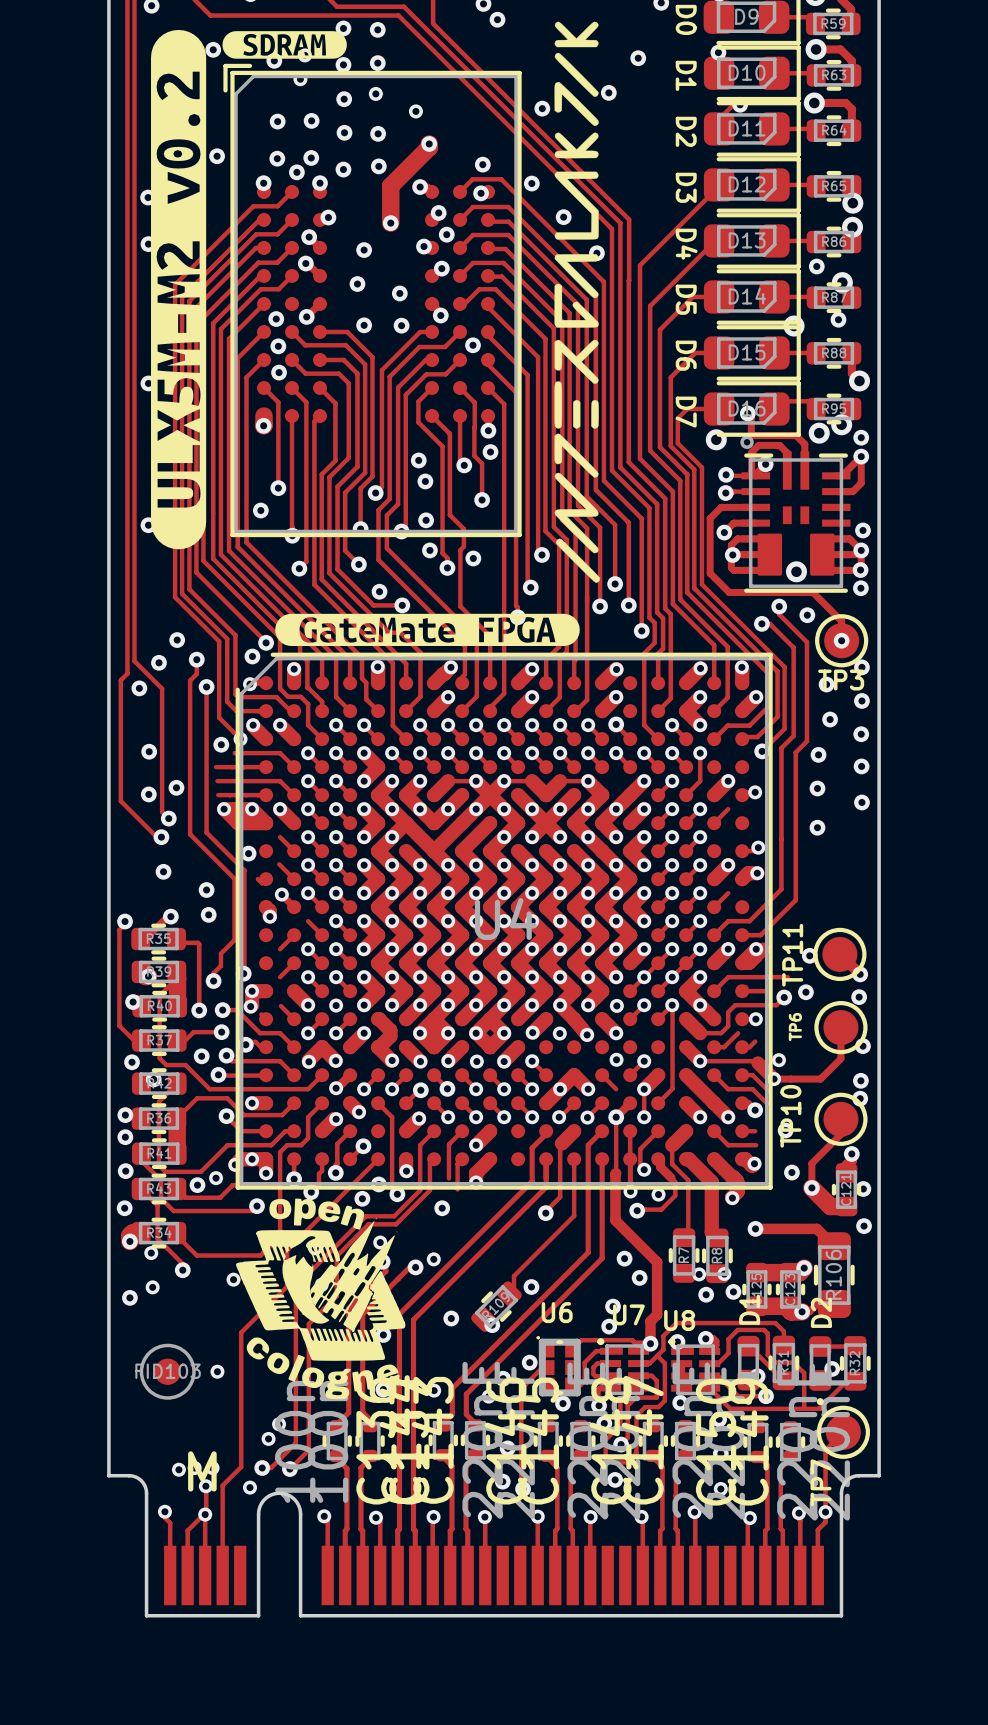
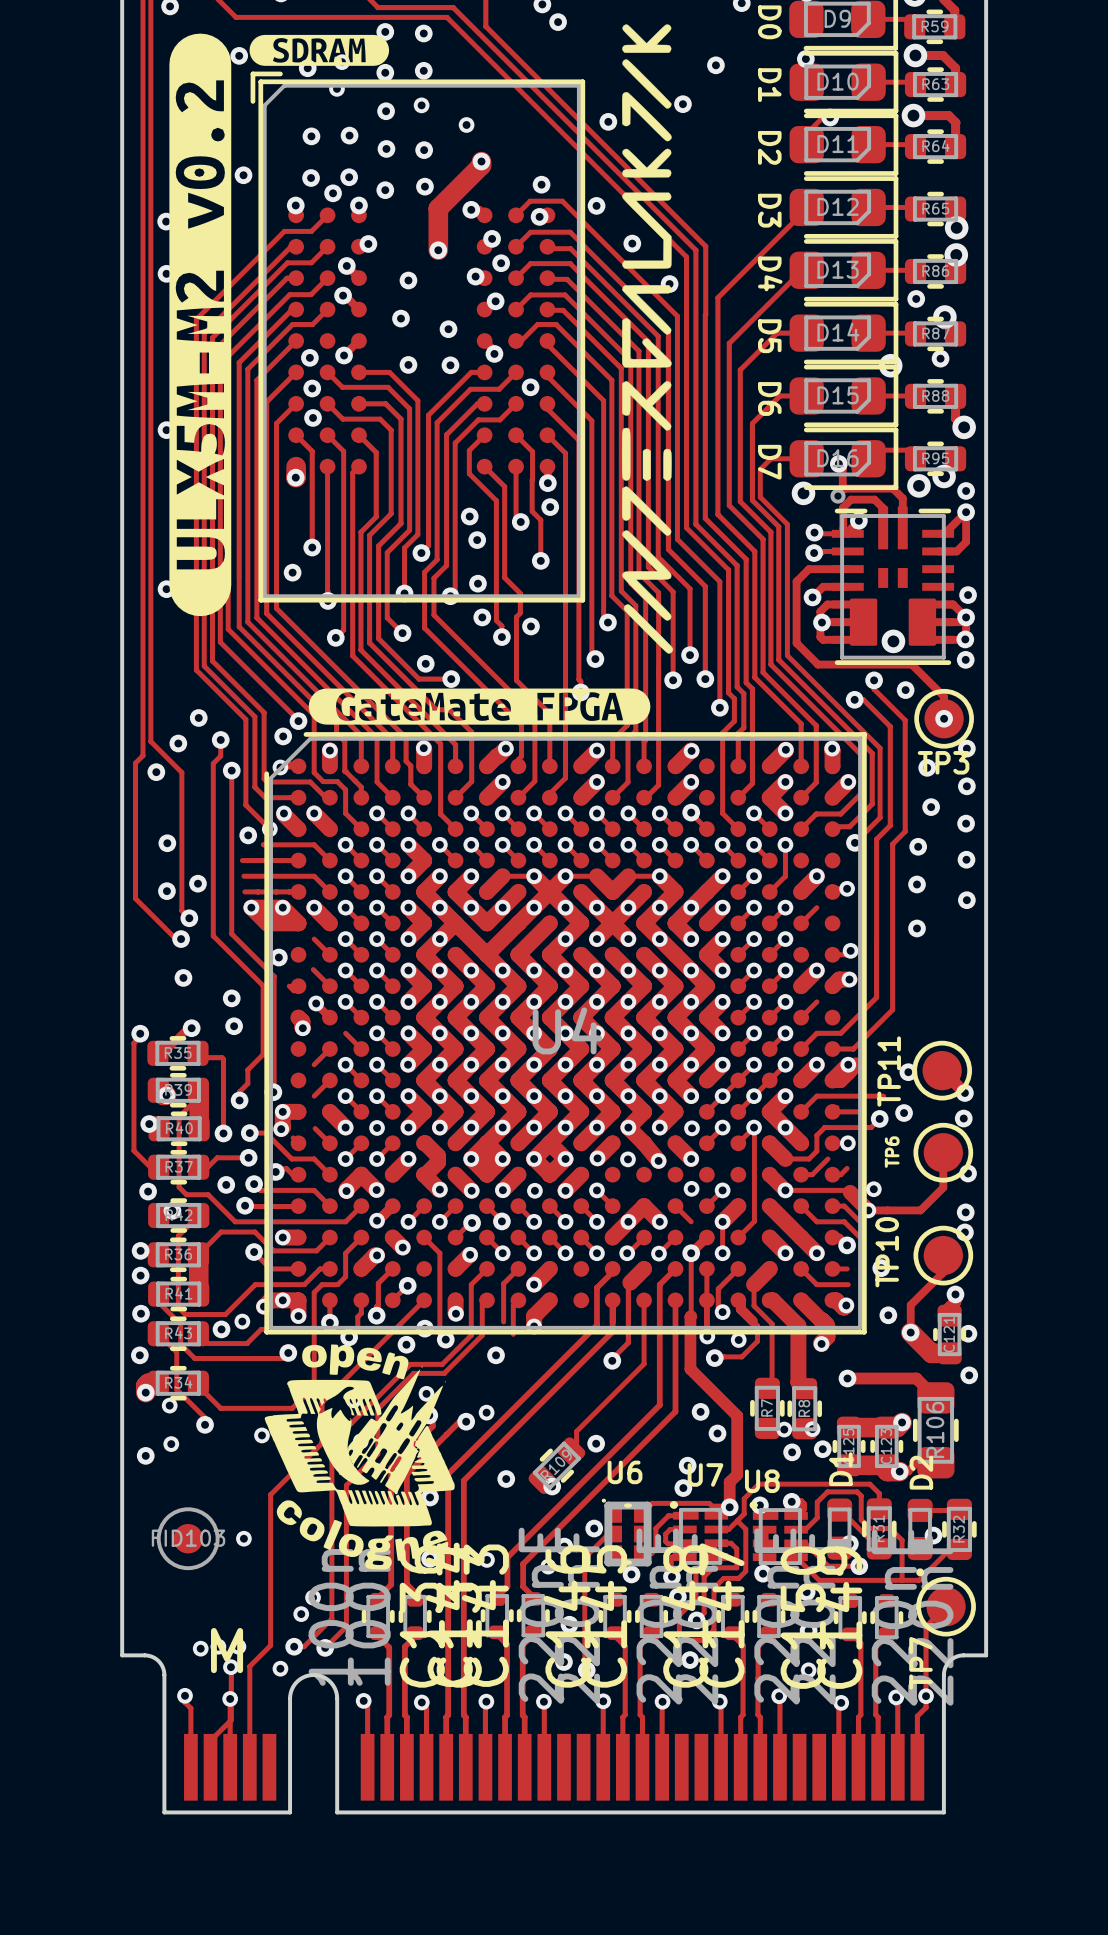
track: (206, 1512) (187, 1530) (187, 1551) -> (231, 1696) (231, 1719) (210, 1740)

